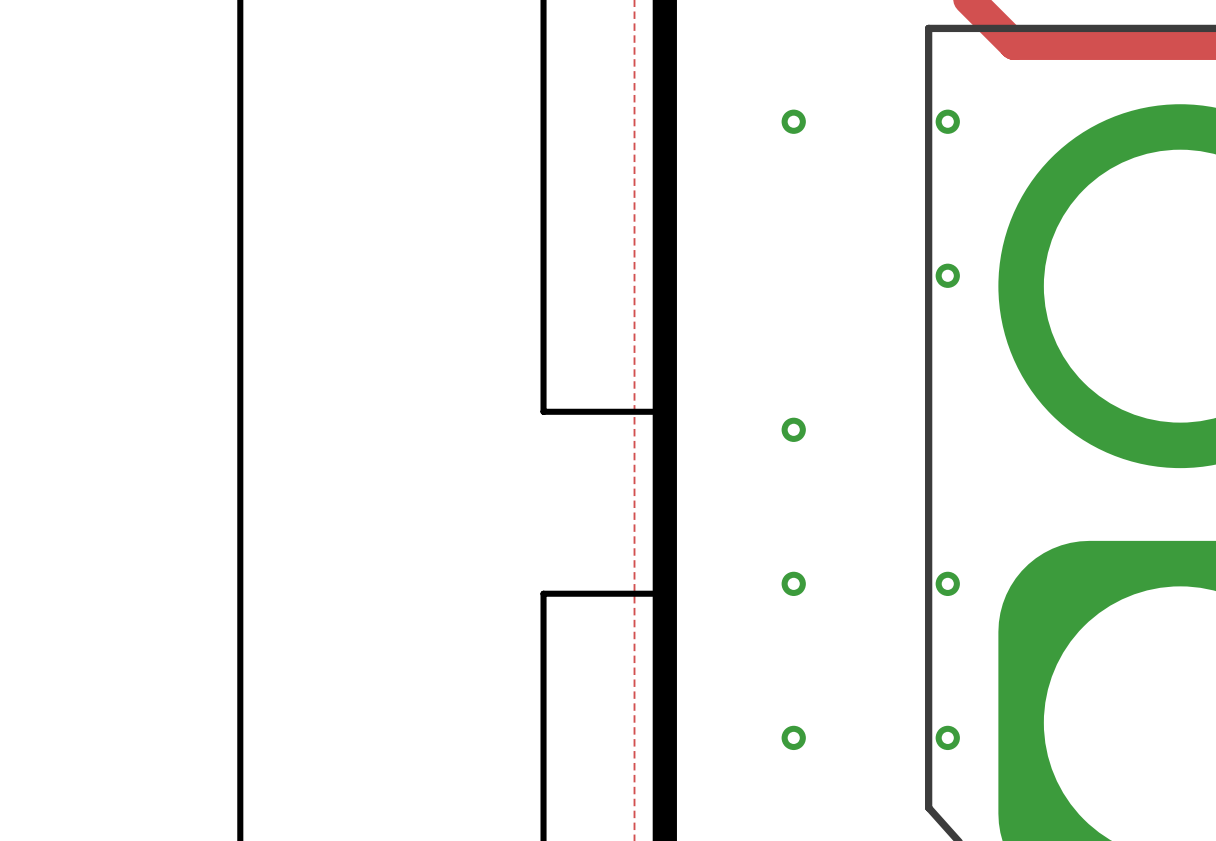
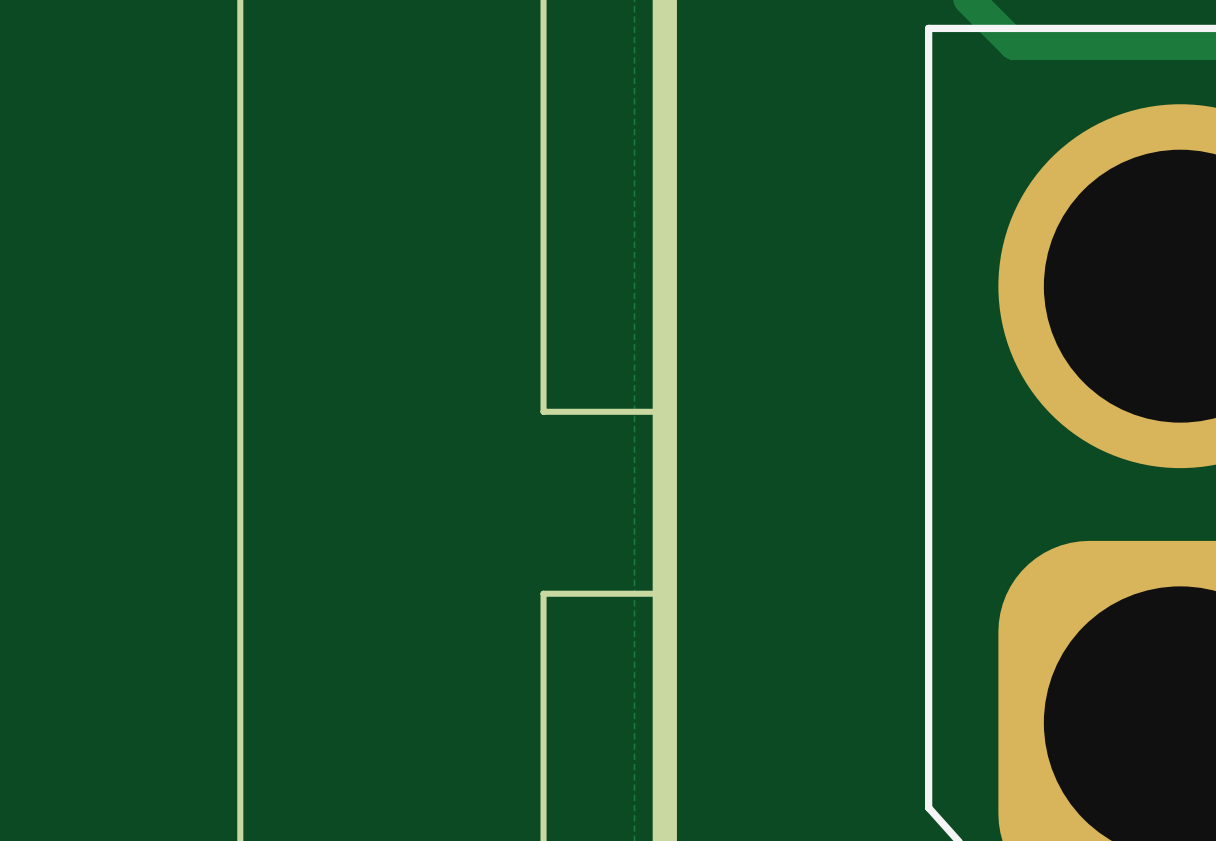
via: (793, 121) -> none
via: (947, 121) -> none
via: (947, 275) -> none
via: (793, 429) -> none
via: (793, 583) -> none
via: (947, 583) -> none
via: (793, 737) -> none
via: (947, 737) -> none

